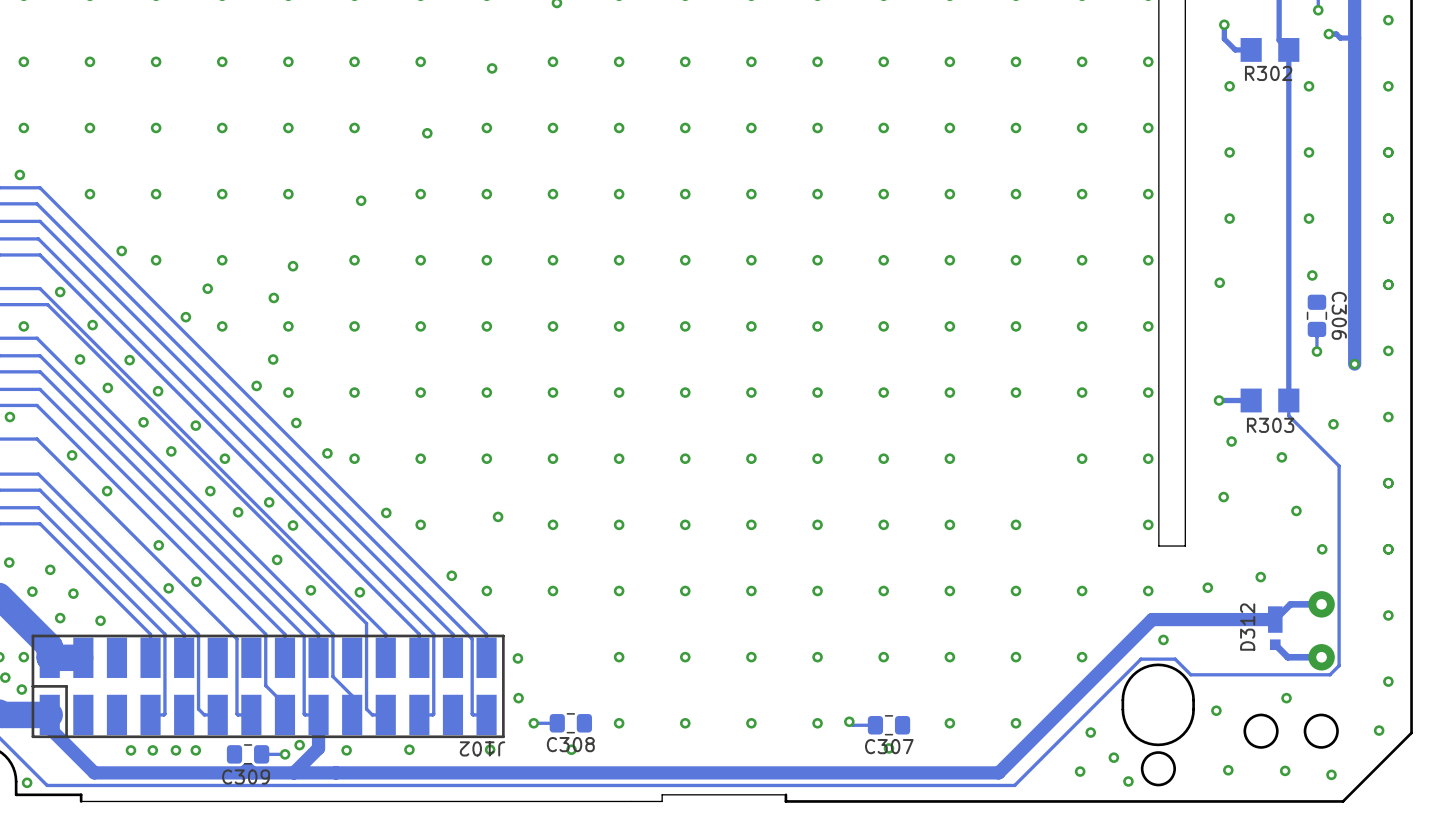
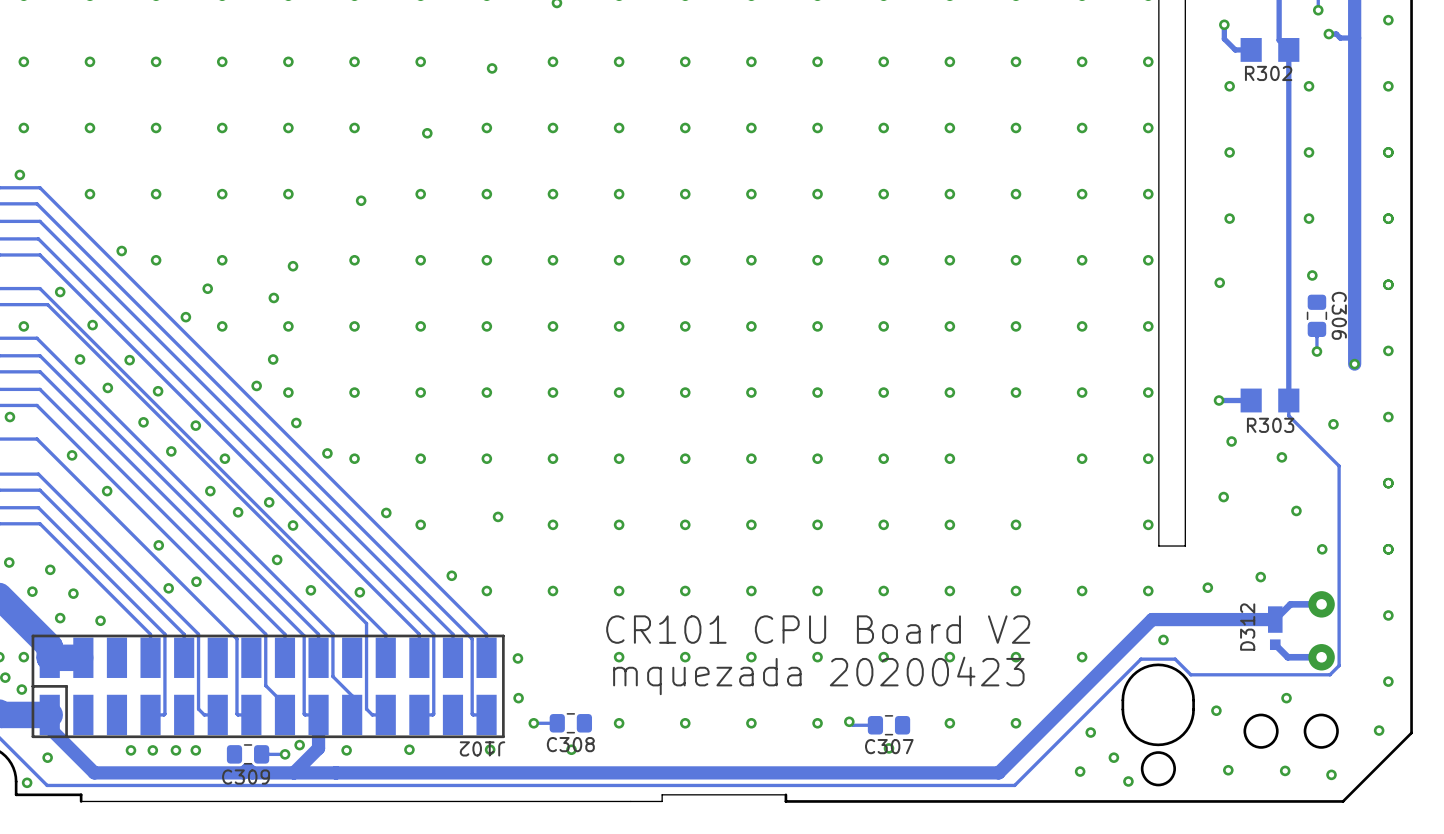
text: none -> CR101 CPU Board V2 (818, 629)
text: none -> mquezada 20200423 (818, 675)
via: none -> (47, 757)

